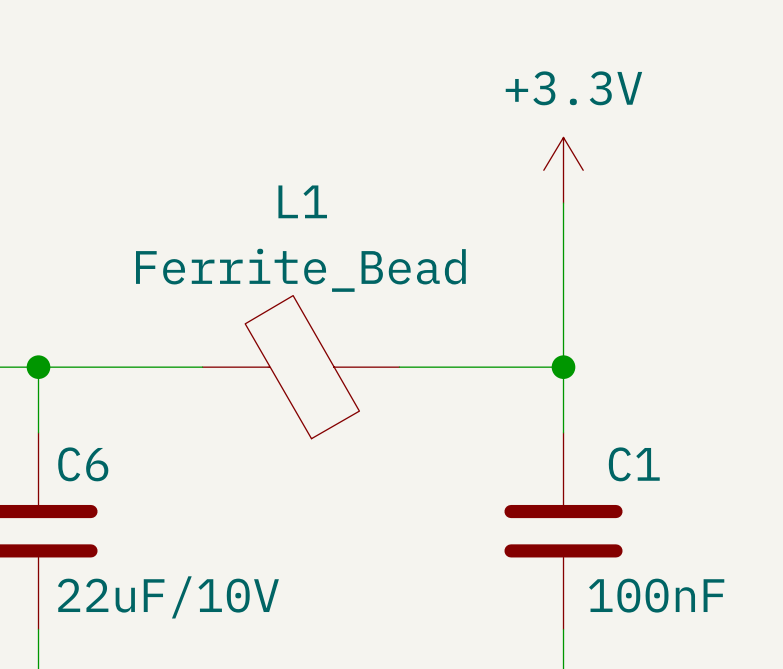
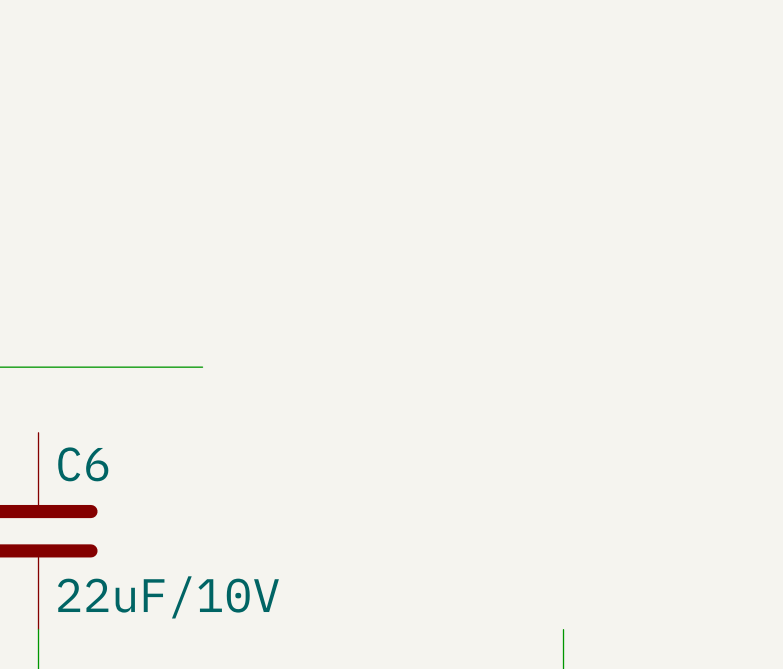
power symbol: +3.3V (563, 170) -> none
wire: (563, 203) (563, 432) -> none
wire: (38, 367) (38, 432) -> none
junction: (38, 367) -> none
L1: Ferrite_Bead (301, 367) -> none
wire: (399, 367) (563, 367) -> none
junction: (563, 367) -> none
C1: 100nF (563, 531) -> none

